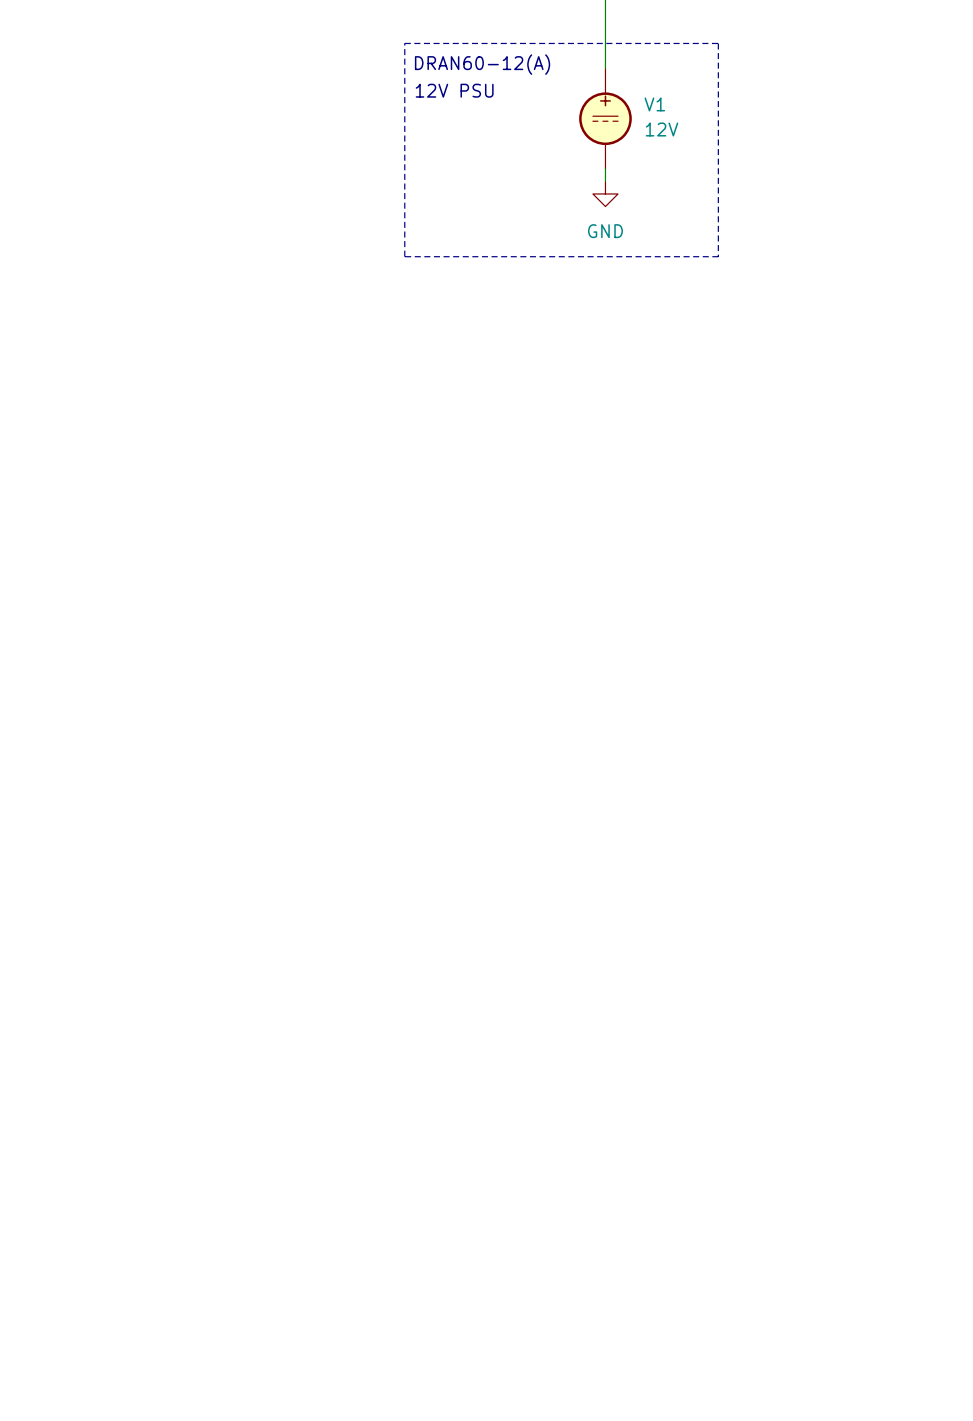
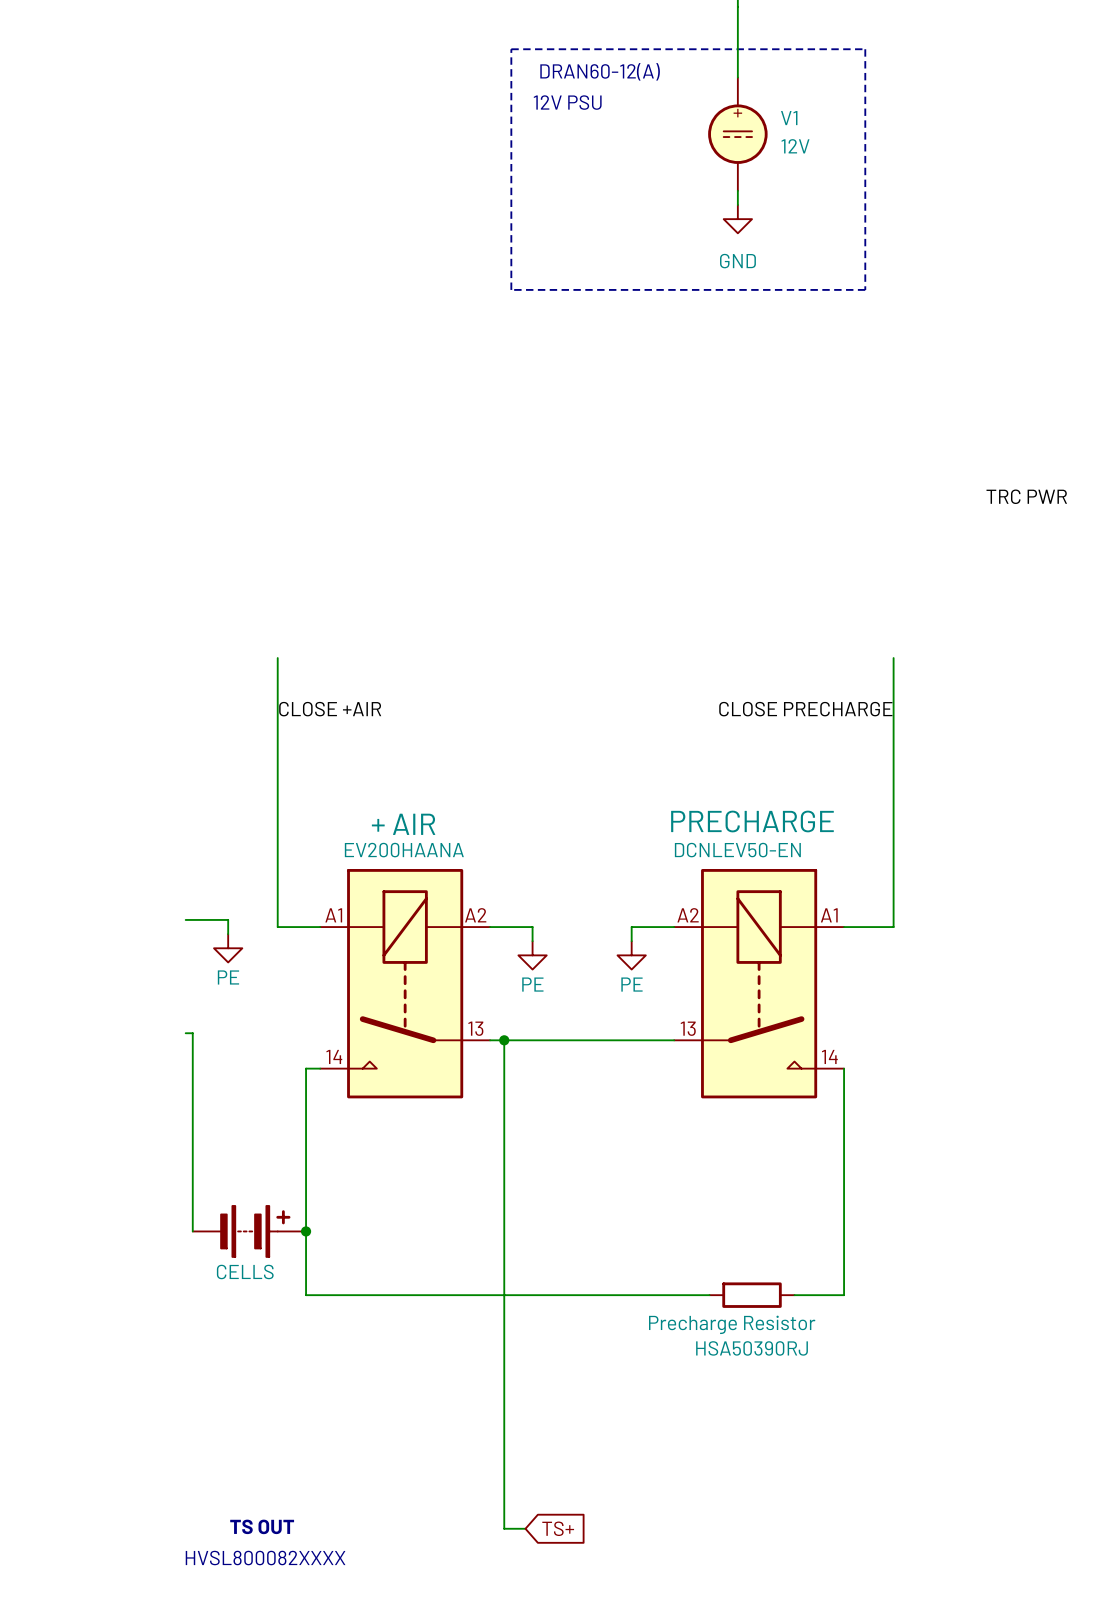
label: none -> TRC PWR (1026, 496)
wire: none -> (277, 658) (277, 927) (320, 927)
wire: none -> (893, 658) (893, 927) (844, 927)
label: none -> CLOSE +AIR (330, 709)
label: none -> CLOSE PRECHARGE (805, 709)
wire: none -> (185, 919) (228, 919) (228, 934)
wire: none -> (490, 927) (532, 927) (532, 941)
wire: none -> (674, 927) (631, 927) (631, 941)
power symbol: none -> PE (228, 948)
power symbol: none -> PE (532, 955)
power symbol: none -> PE (631, 955)
part: none -> + AIR (405, 983)
part: none -> PRECHARGE (759, 983)
wire: none -> (185, 1033) (192, 1033) (192, 1231)
wire: none -> (490, 1040) (674, 1040)
wire: none -> (504, 1040) (504, 1528) (525, 1528)
junction: none -> (504, 1040)
wire: none -> (320, 1068) (306, 1068) (306, 1295) (709, 1295)
wire: none -> (844, 1068) (844, 1295) (794, 1295)
part: none -> CELLS (249, 1231)
junction: none -> (306, 1231)
part: none -> Precharge Resistor (752, 1295)
text: none -> TS OUT (262, 1526)
global label: none -> TS+ (558, 1528)
text: none -> HVSL800082XXXX (265, 1558)

